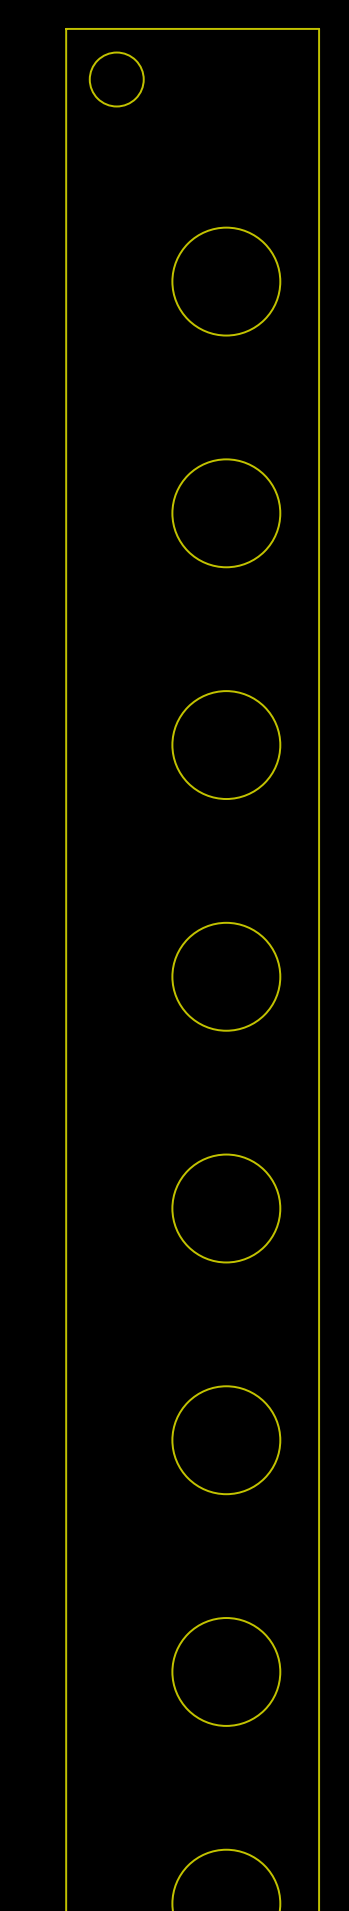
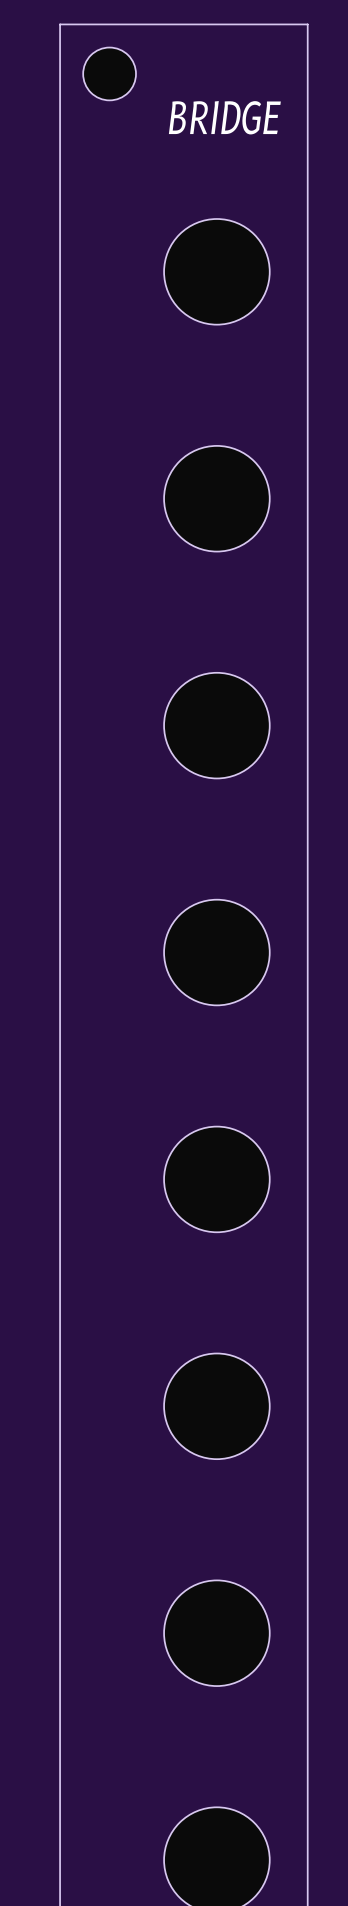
text: none -> BRIDGE (224, 117)

